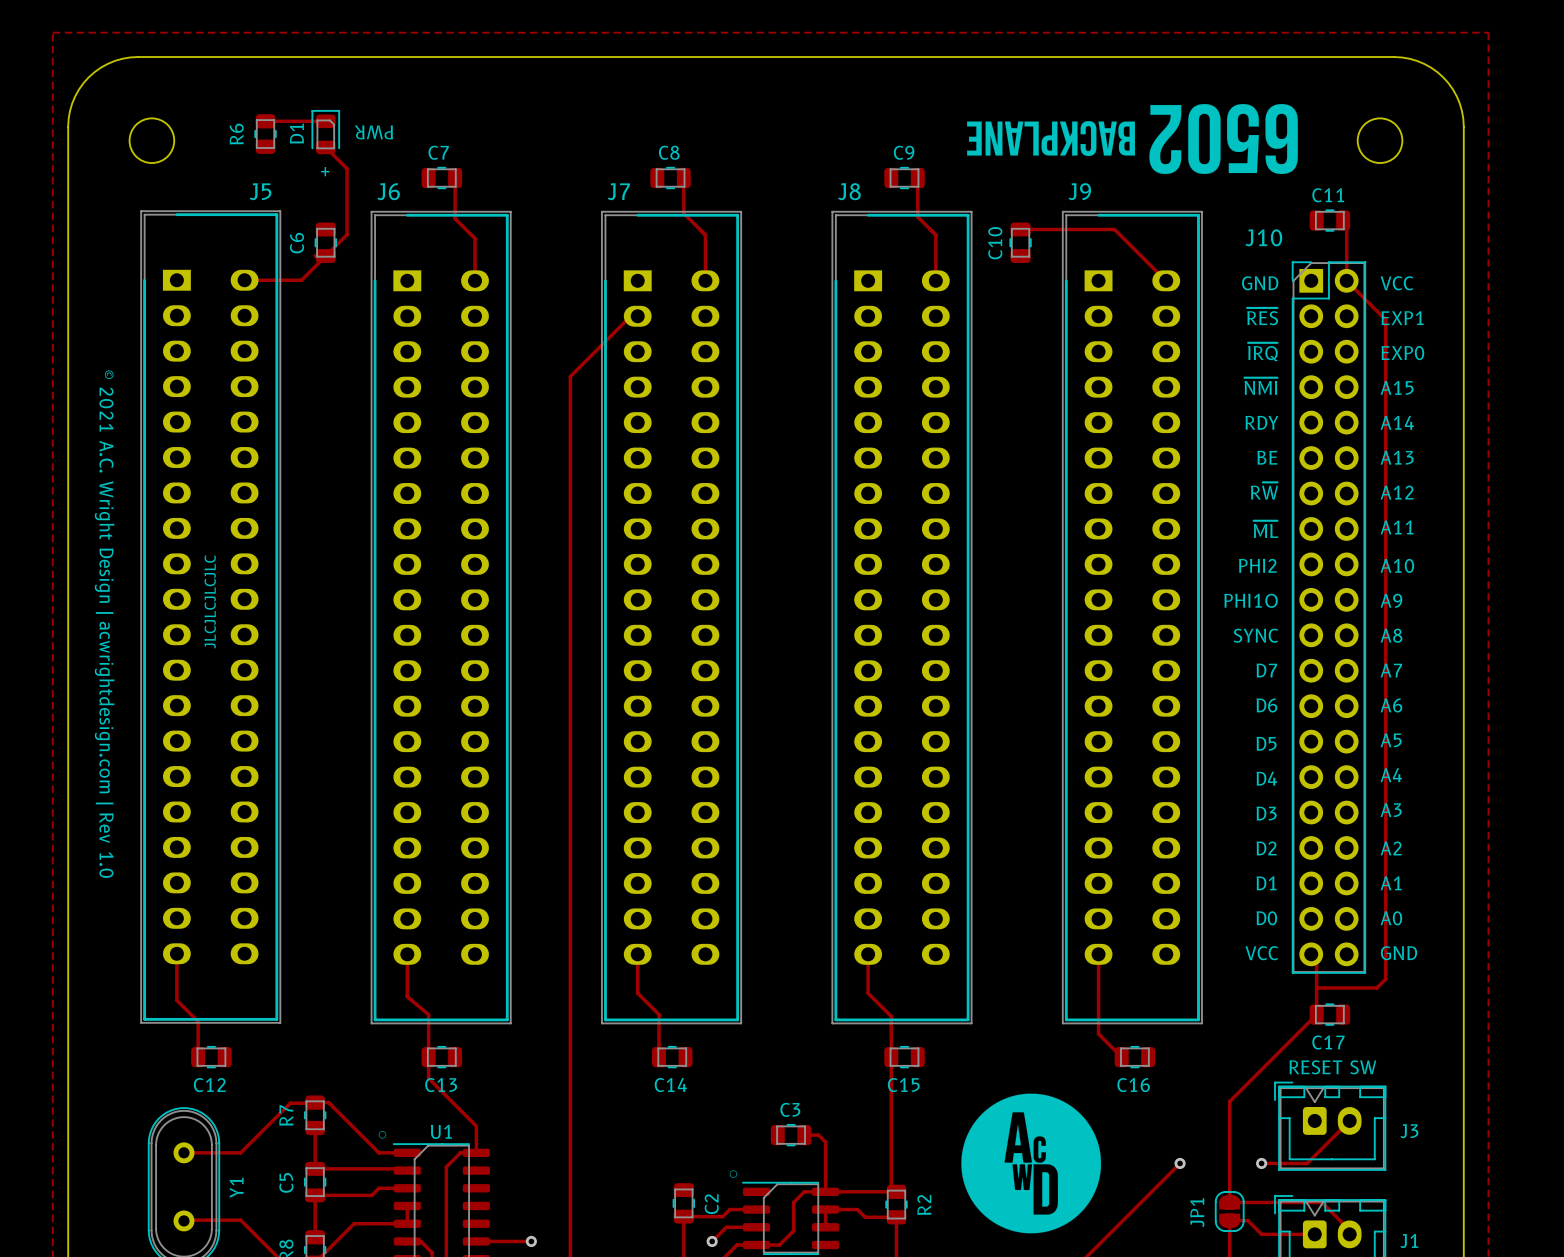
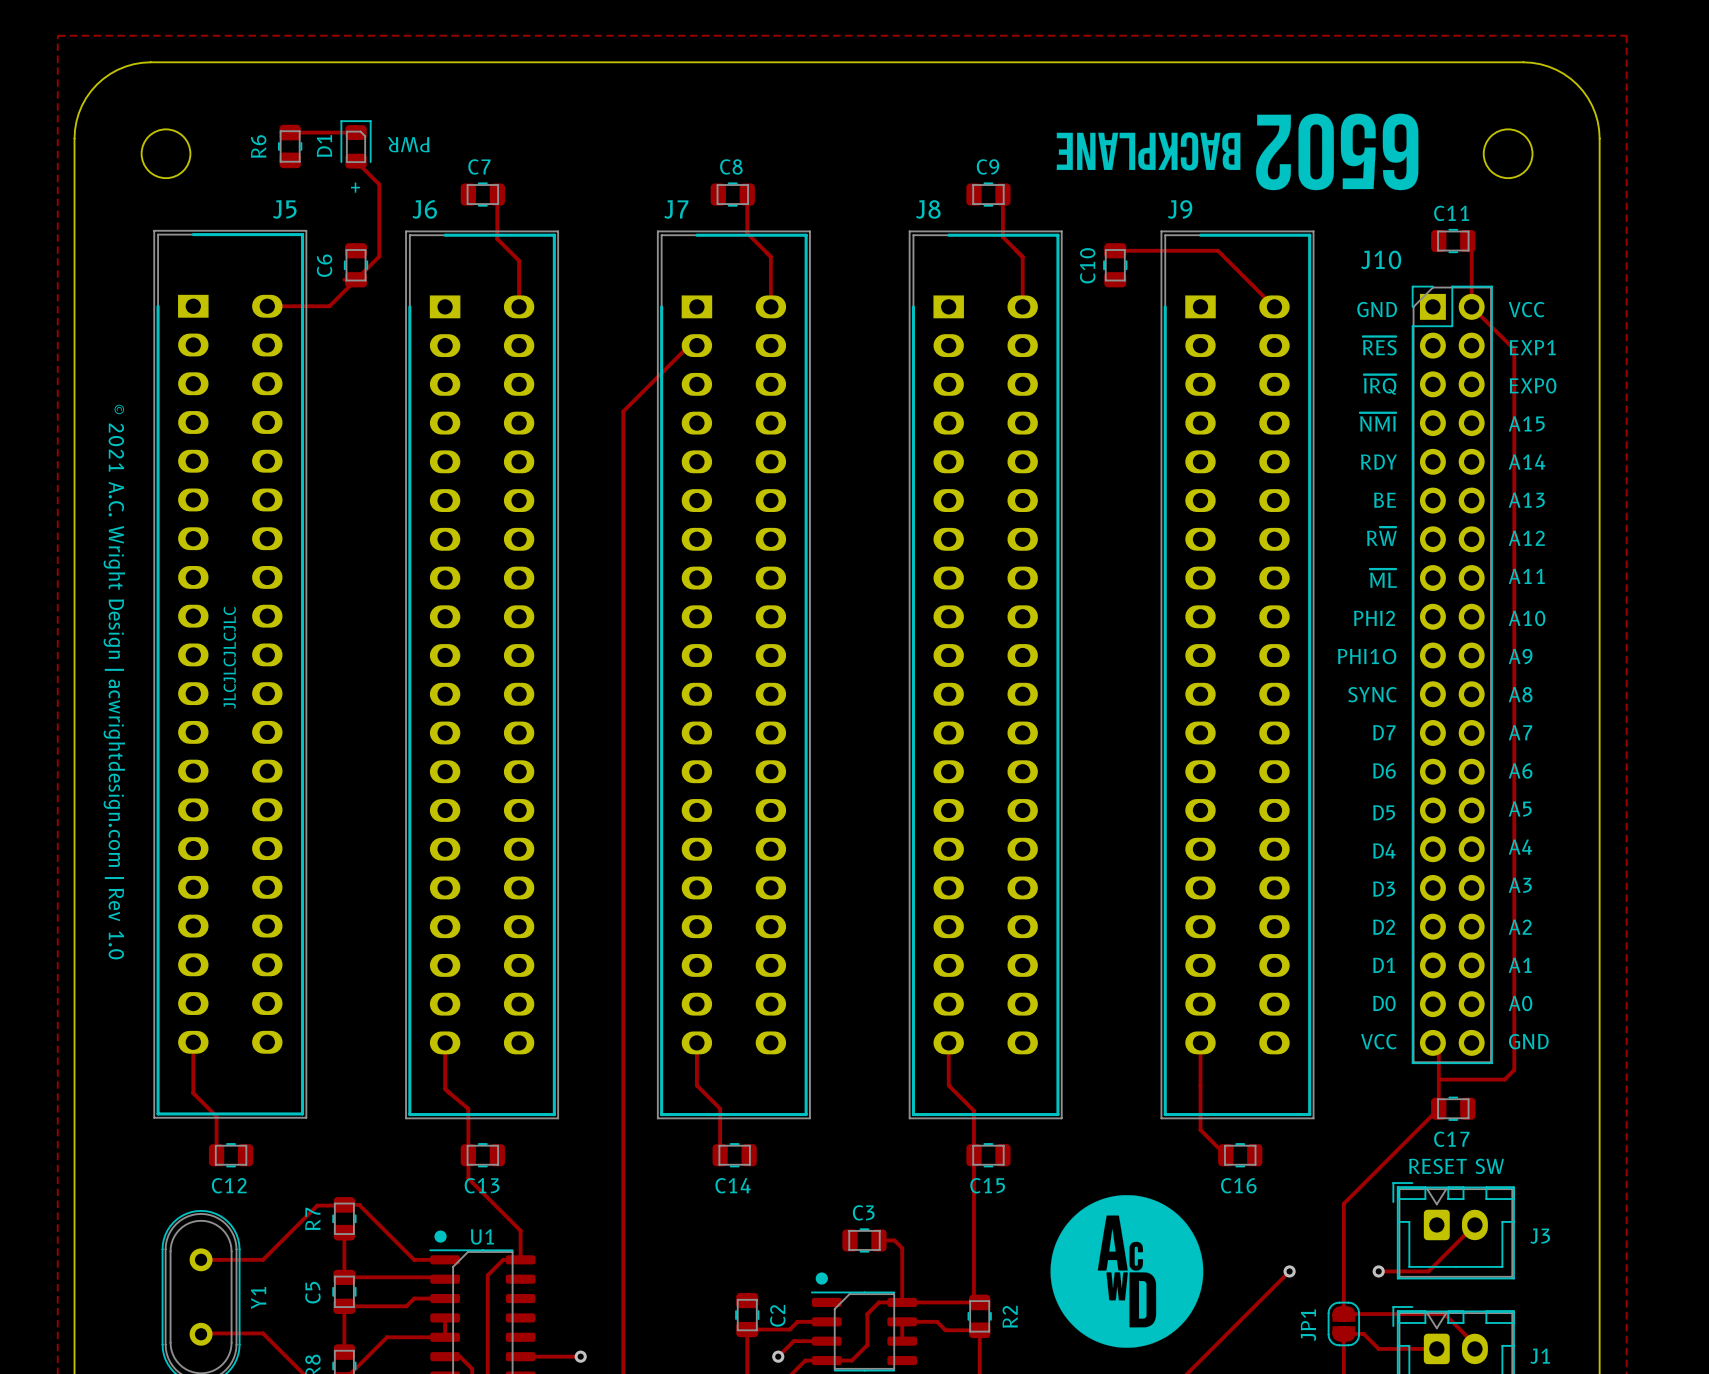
drawing: none -> [434, 1230, 447, 1243]
drawing: [378, 1131, 387, 1139] -> none
drawing: none -> [815, 1272, 828, 1285]
drawing: [729, 1170, 738, 1178] -> none

